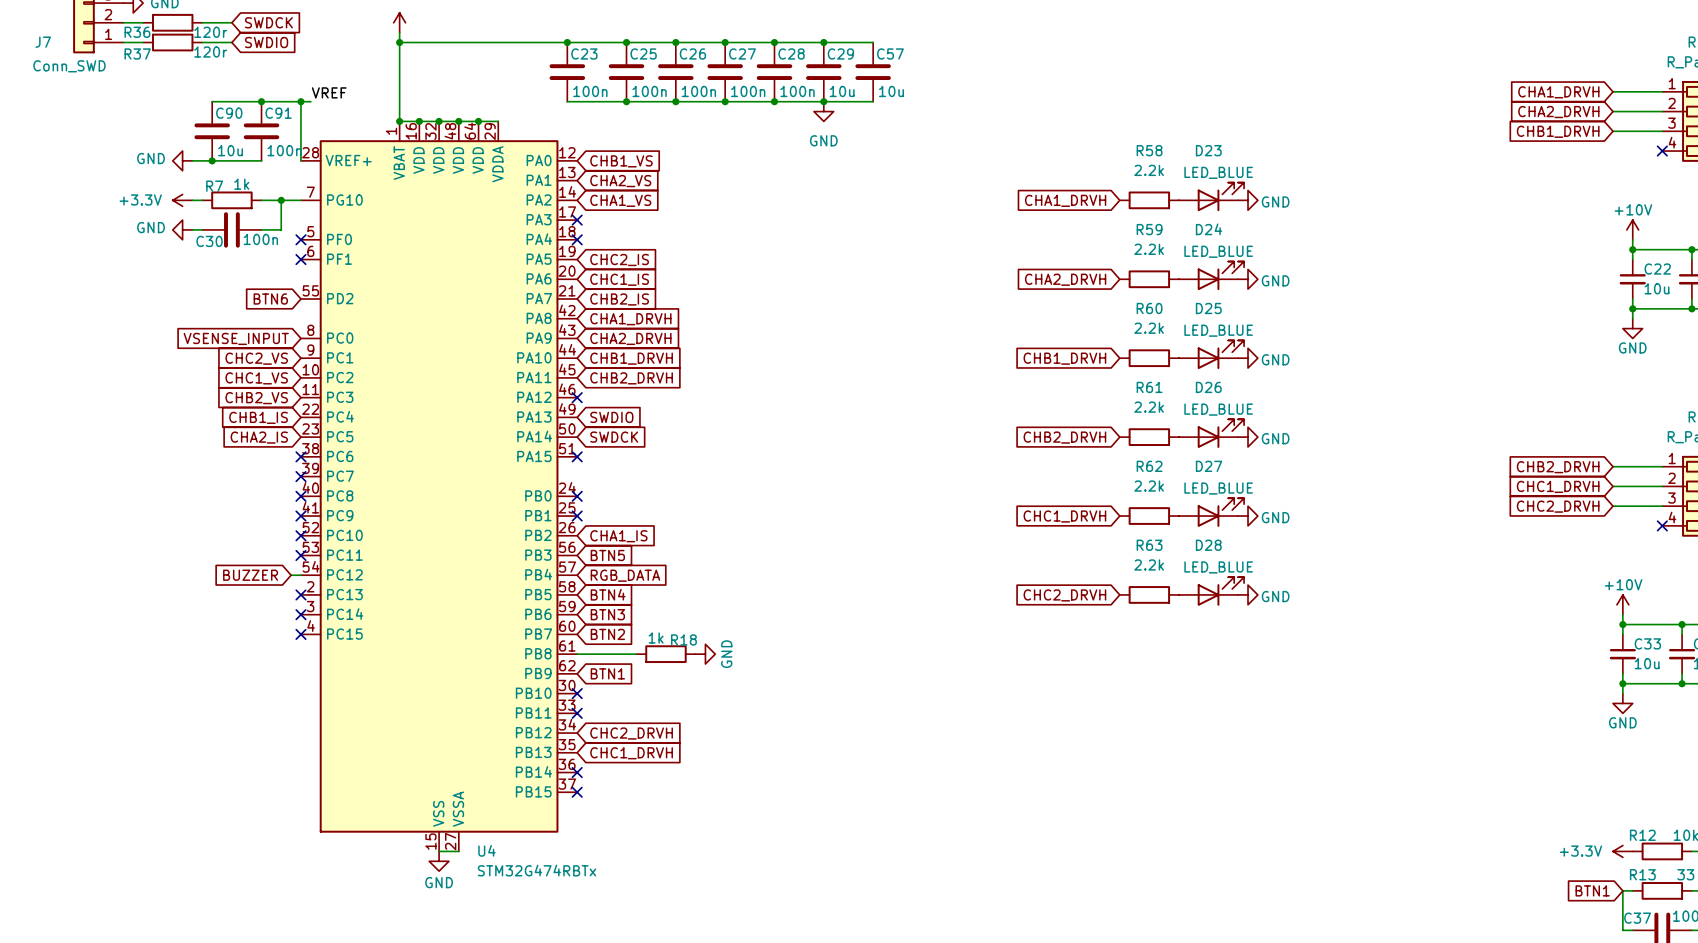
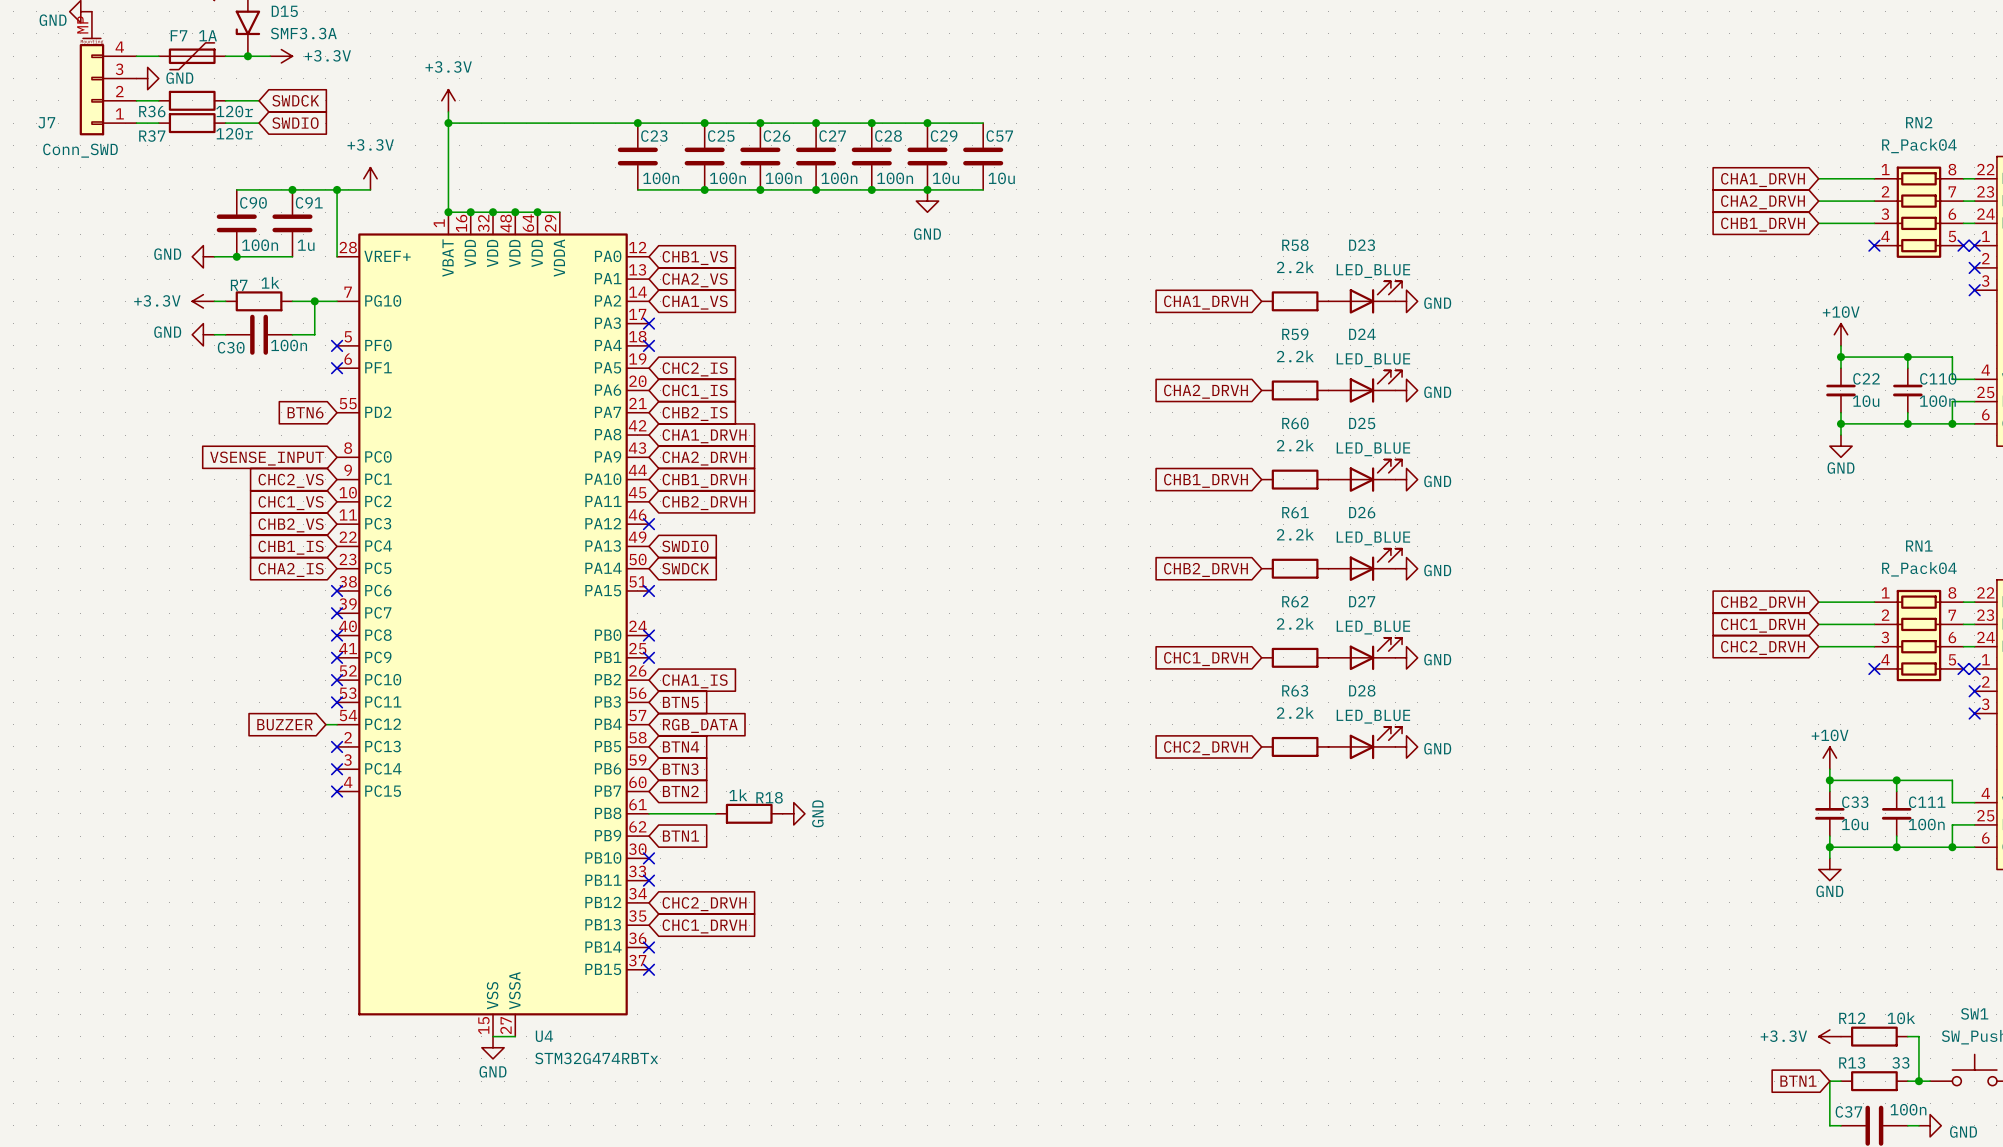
power symbol: none -> +3.3V (370, 178)
label: VREF (329, 92) -> none
wire: none -> (348, 189) (370, 189)
C90 value: 10u (230, 150) -> 100n (260, 245)
C91 value: 100n (284, 150) -> 1u (306, 245)

